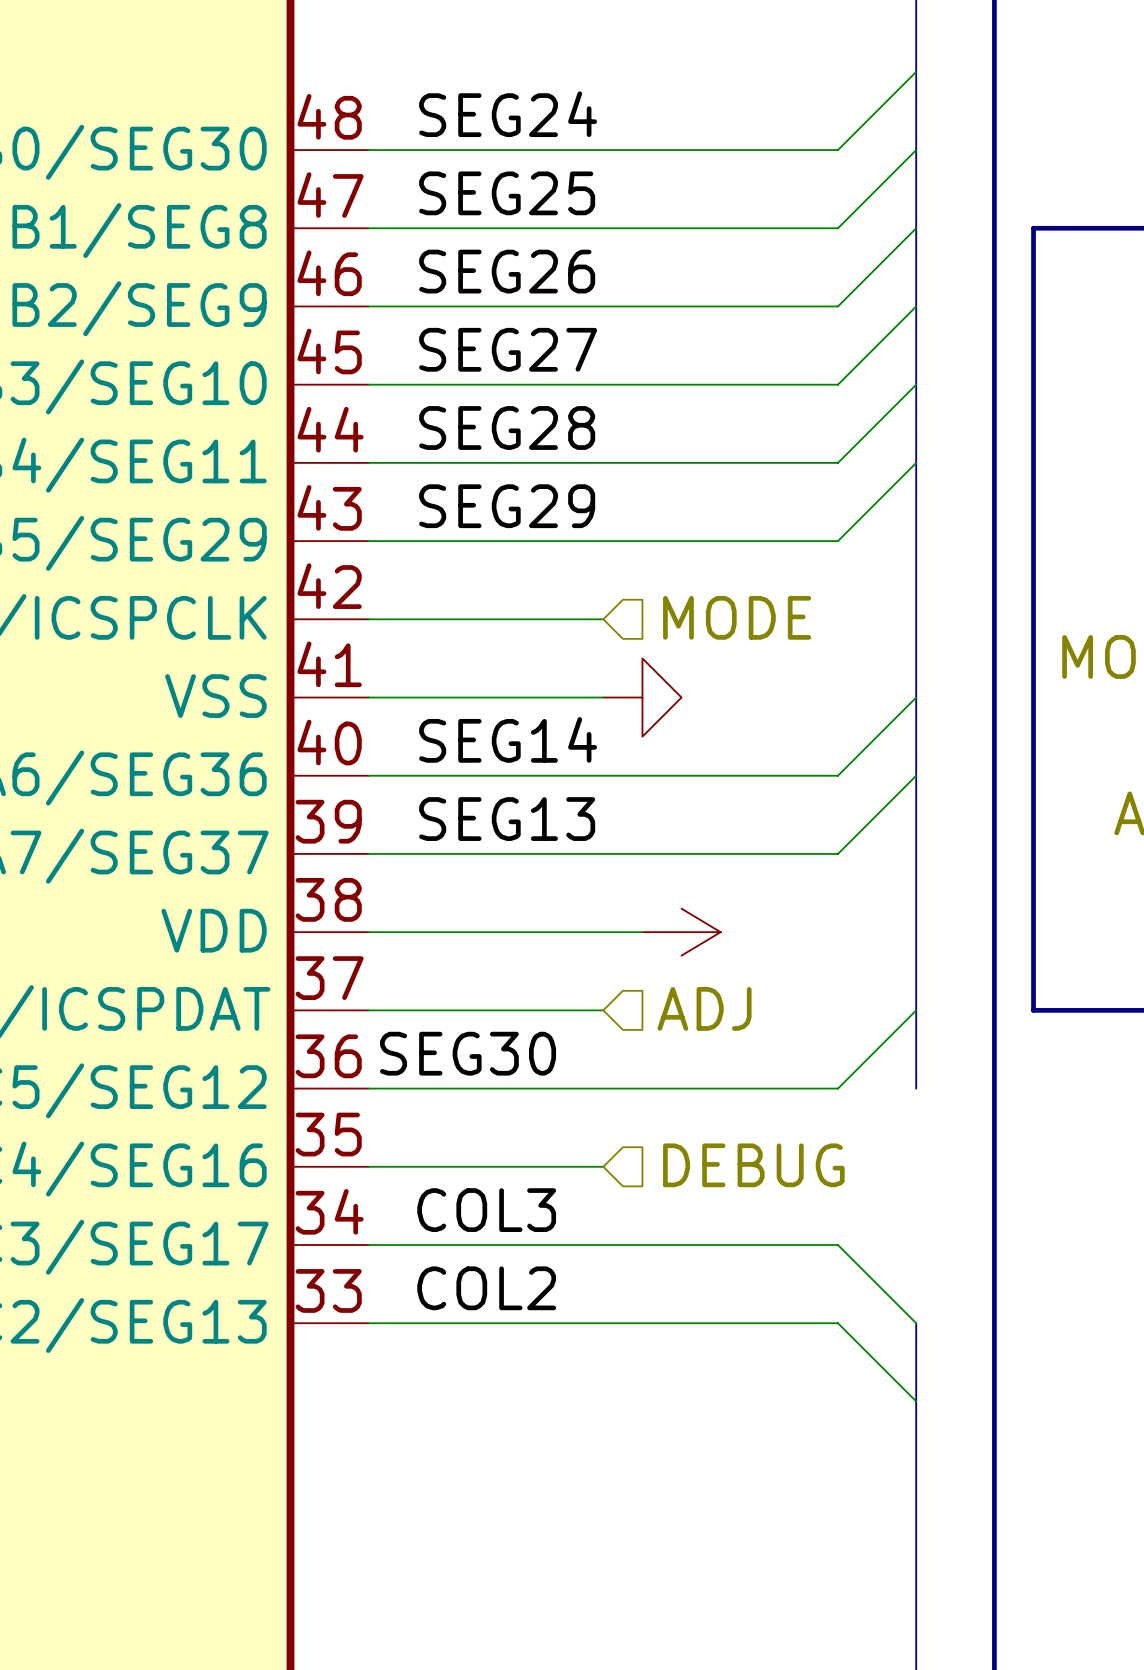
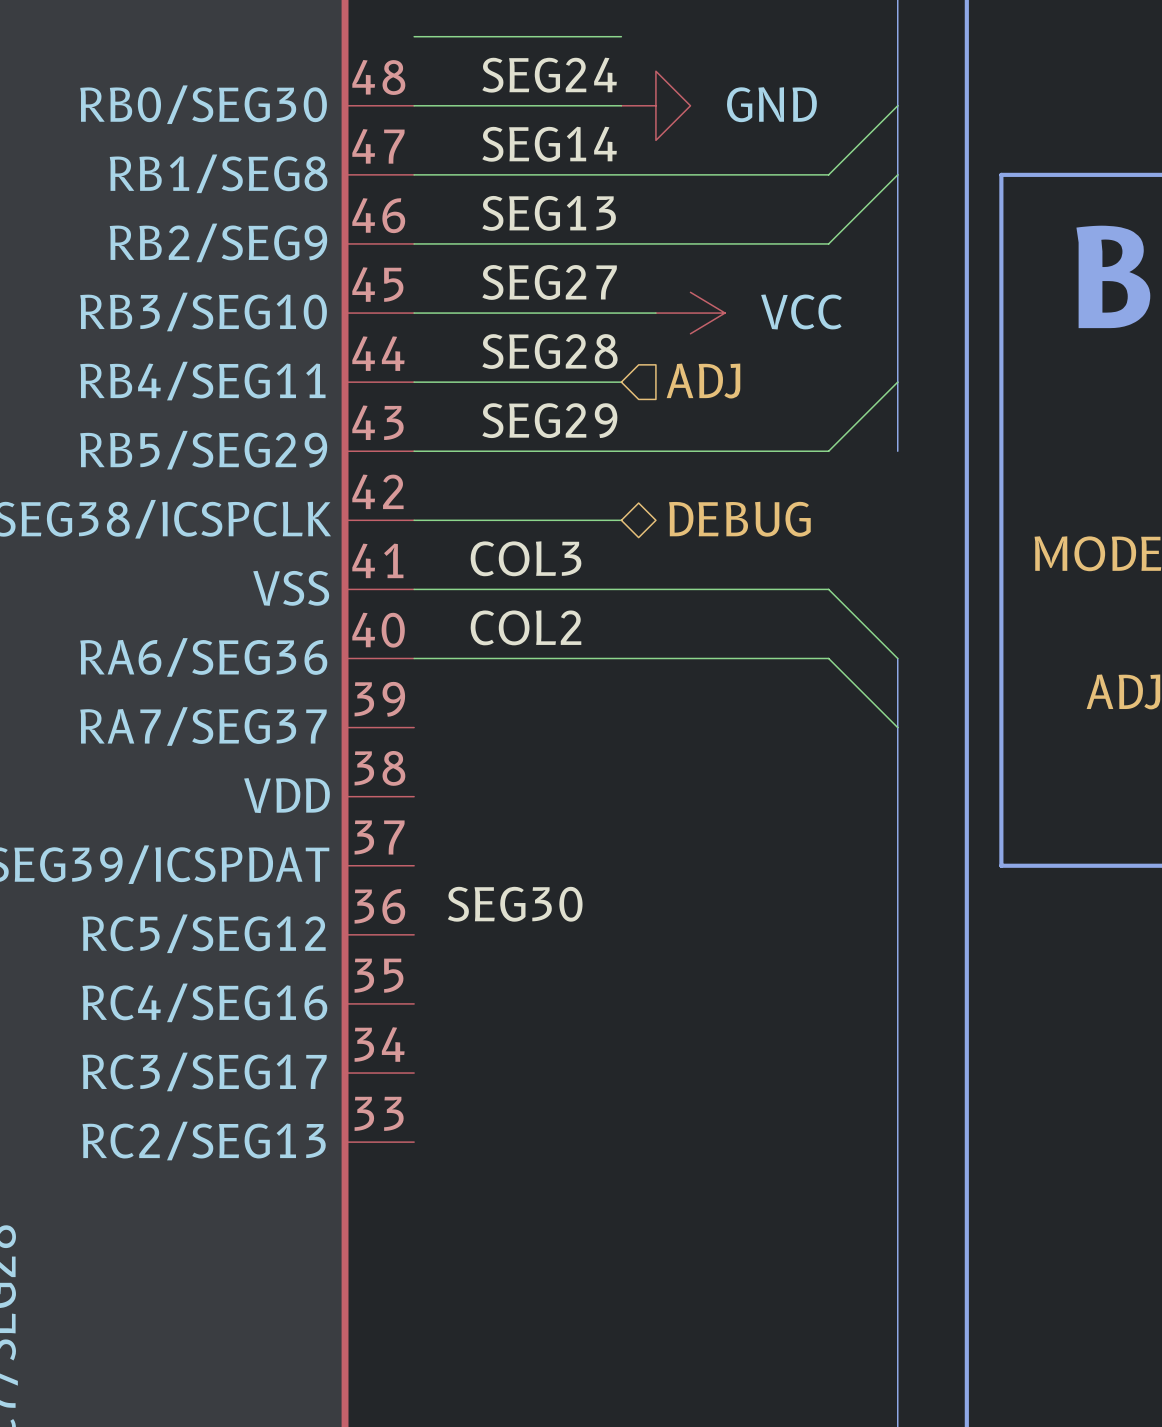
wire: none -> (414, 36) (621, 36)
wire: (916, 71) (837, 150) (603, 150) -> none
power symbol: none -> GND (655, 105)
label: SEG25 (507, 193) -> SEG14 (549, 144)
label: SEG26 (507, 271) -> SEG13 (549, 213)
wire: (916, 306) (837, 384) (642, 384) -> none
power symbol: none -> VCC (690, 313)
wire: (916, 384) (837, 462) (603, 462) -> none
bus: (916, 541) (916, 775) -> (897, 934) (897, 1142)
hierarchical label shape: input (737, 617) -> bidirectional (739, 519)
hierarchical label: MODE (737, 617) -> DEBUG (739, 519)
power symbol: (642, 697) -> none
wire: (916, 697) (837, 775) -> (897, 727) (828, 658)
label: SEG14 (508, 739) -> none
wire: (916, 775) (837, 853) (368, 853) -> (897, 658) (828, 589) (621, 589)
label: SEG13 (507, 819) -> none
wire: (368, 932) (642, 932) -> none
power symbol: (681, 932) -> none
hierarchical label position: ADJ (704, 1008) -> ADJ (703, 381)
wire: (368, 1010) (603, 1010) -> none
wire: (916, 1010) (837, 1088) (368, 1088) -> none
hierarchical label: DEBUG (753, 1165) -> none
wire: (368, 1166) (603, 1166) -> none
label position: COL3 (486, 1210) -> COL3 (526, 558)
wire: (368, 1245) (837, 1245) (916, 1323) -> none
label position: COL2 (486, 1288) -> COL2 (526, 627)
wire: (368, 1323) (837, 1323) (916, 1401) -> none

